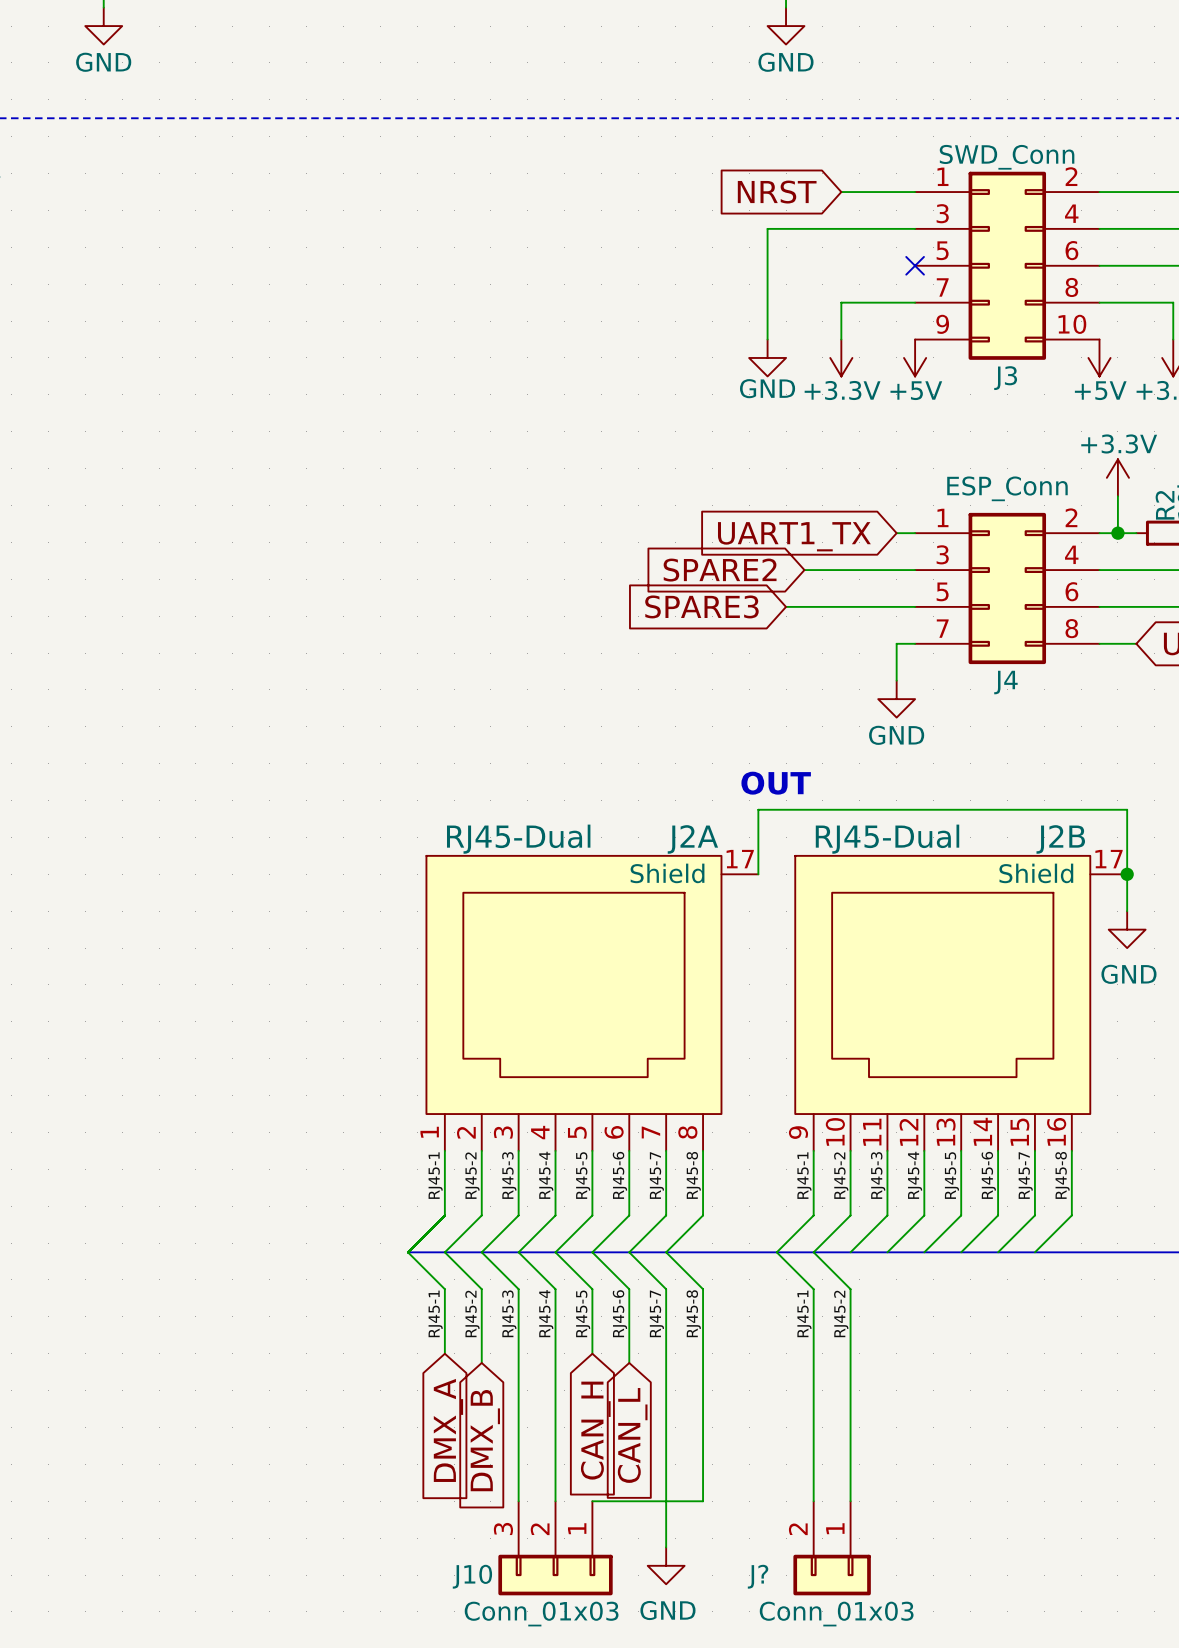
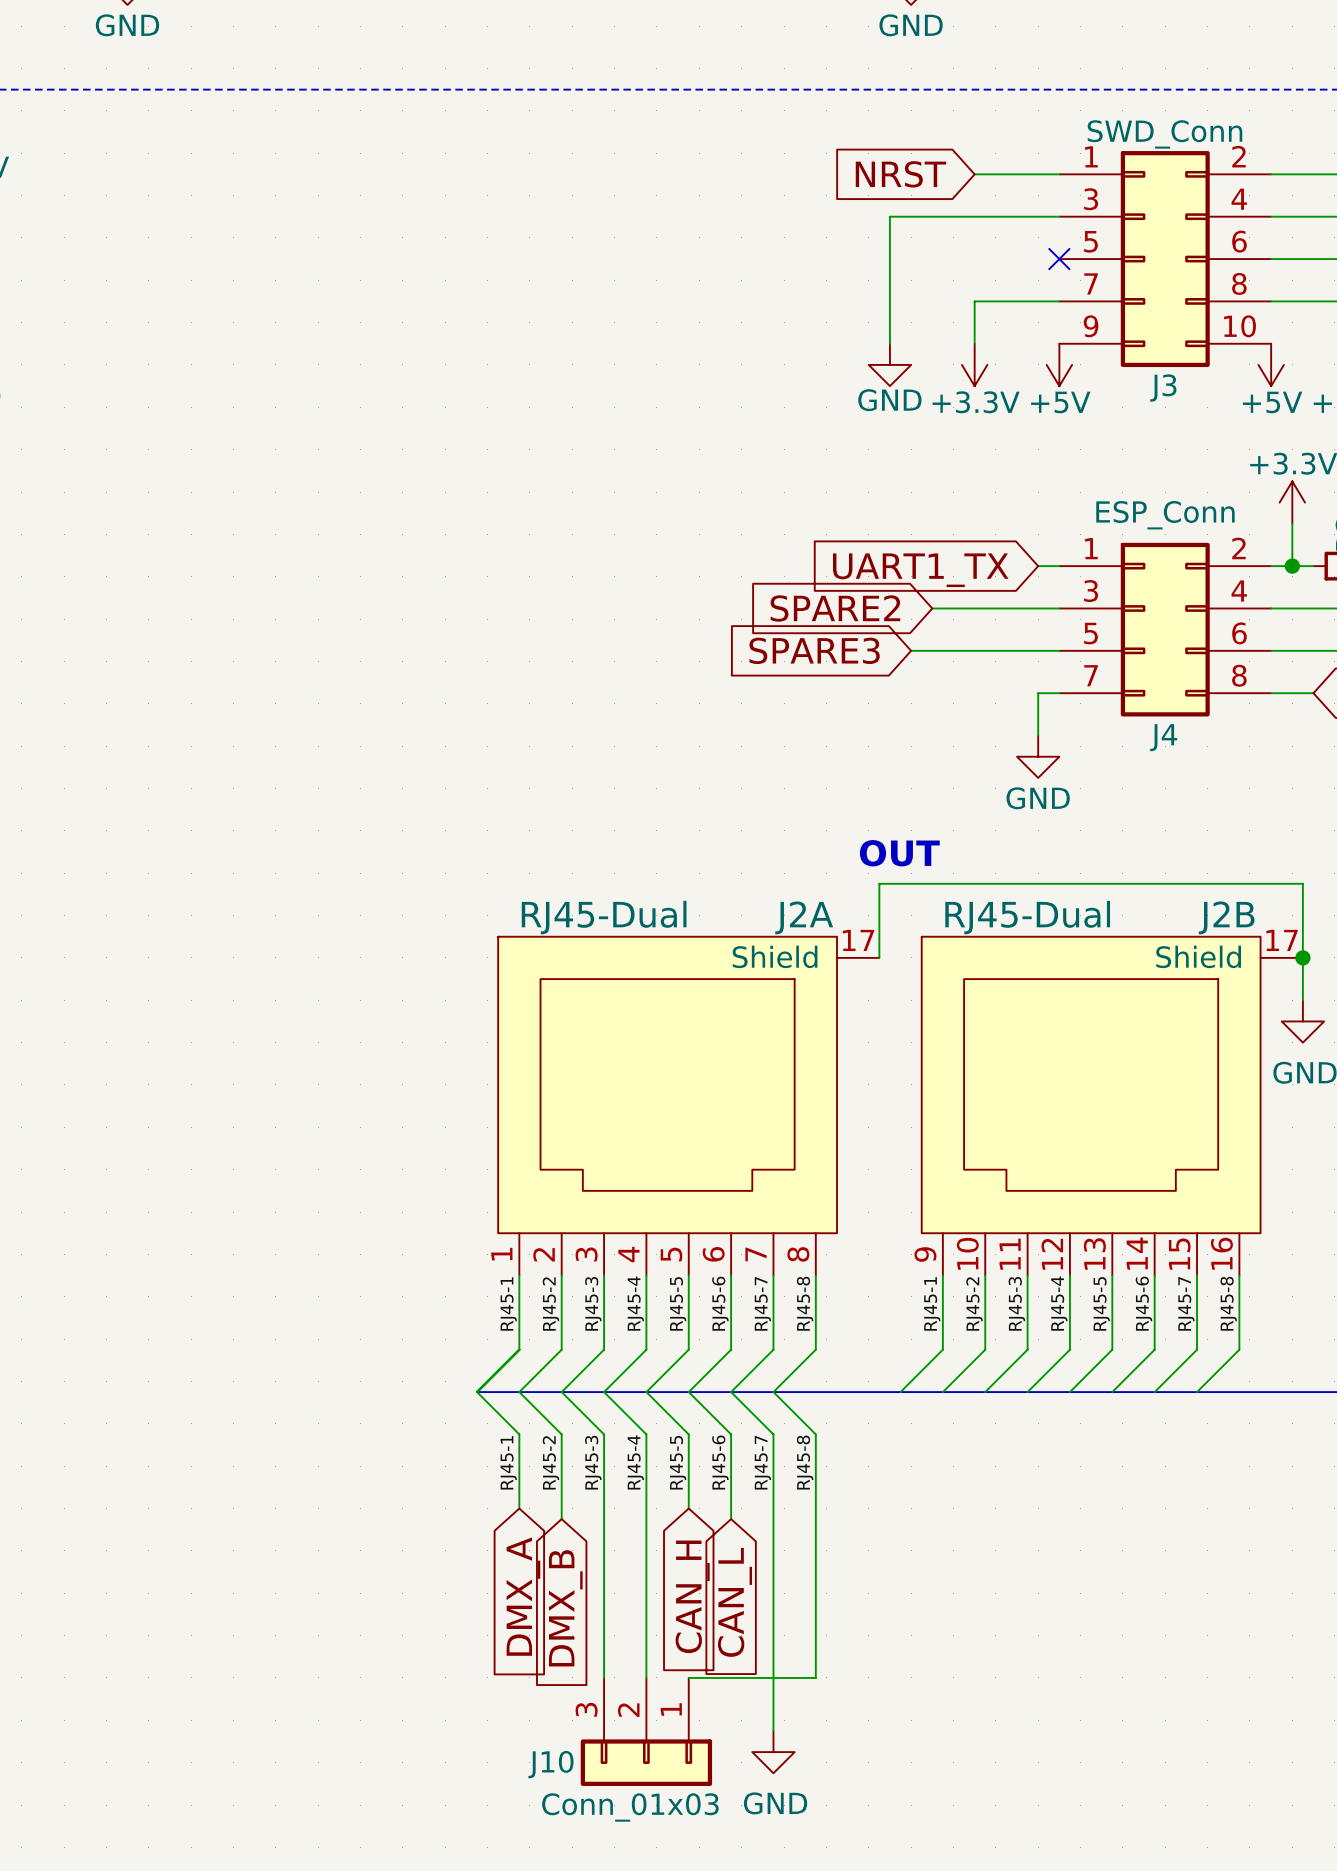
wire: (776, 1252) (813, 1289) (813, 1501) -> none
wire: (813, 1252) (850, 1289) (850, 1501) -> none
label: RJ45-1 (804, 1313) -> none
label: RJ45-2 (841, 1313) -> none
J?: Conn_01x03 (832, 1548) -> none

